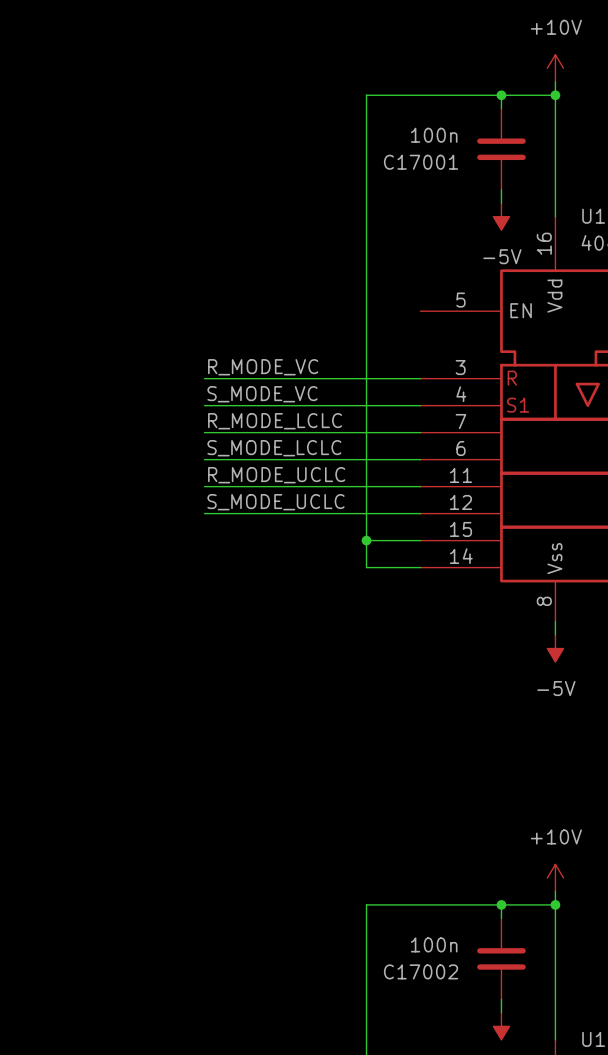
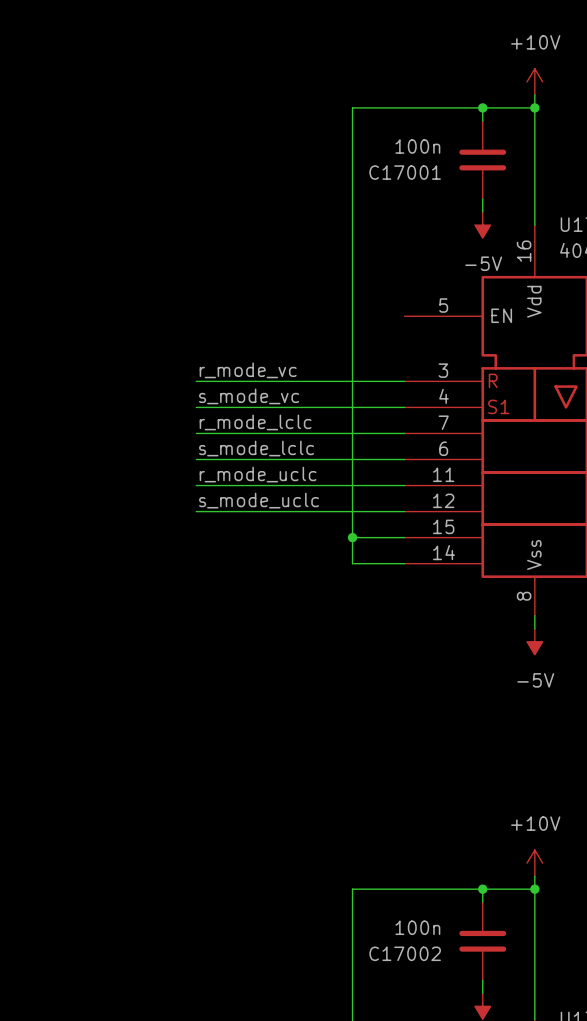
label: R_MODE_VC (263, 367) -> r_mode_vc (248, 370)
label: S_MODE_VC (262, 394) -> s_mode_vc (249, 396)
label: R_MODE_LCLC (275, 421) -> r_mode_lclc (255, 422)
label: S_MODE_LCLC (274, 448) -> s_mode_lclc (256, 448)
label: R_MODE_UCLC (276, 475) -> r_mode_uclc (258, 474)
label: S_MODE_UCLC (276, 502) -> s_mode_uclc (259, 500)

